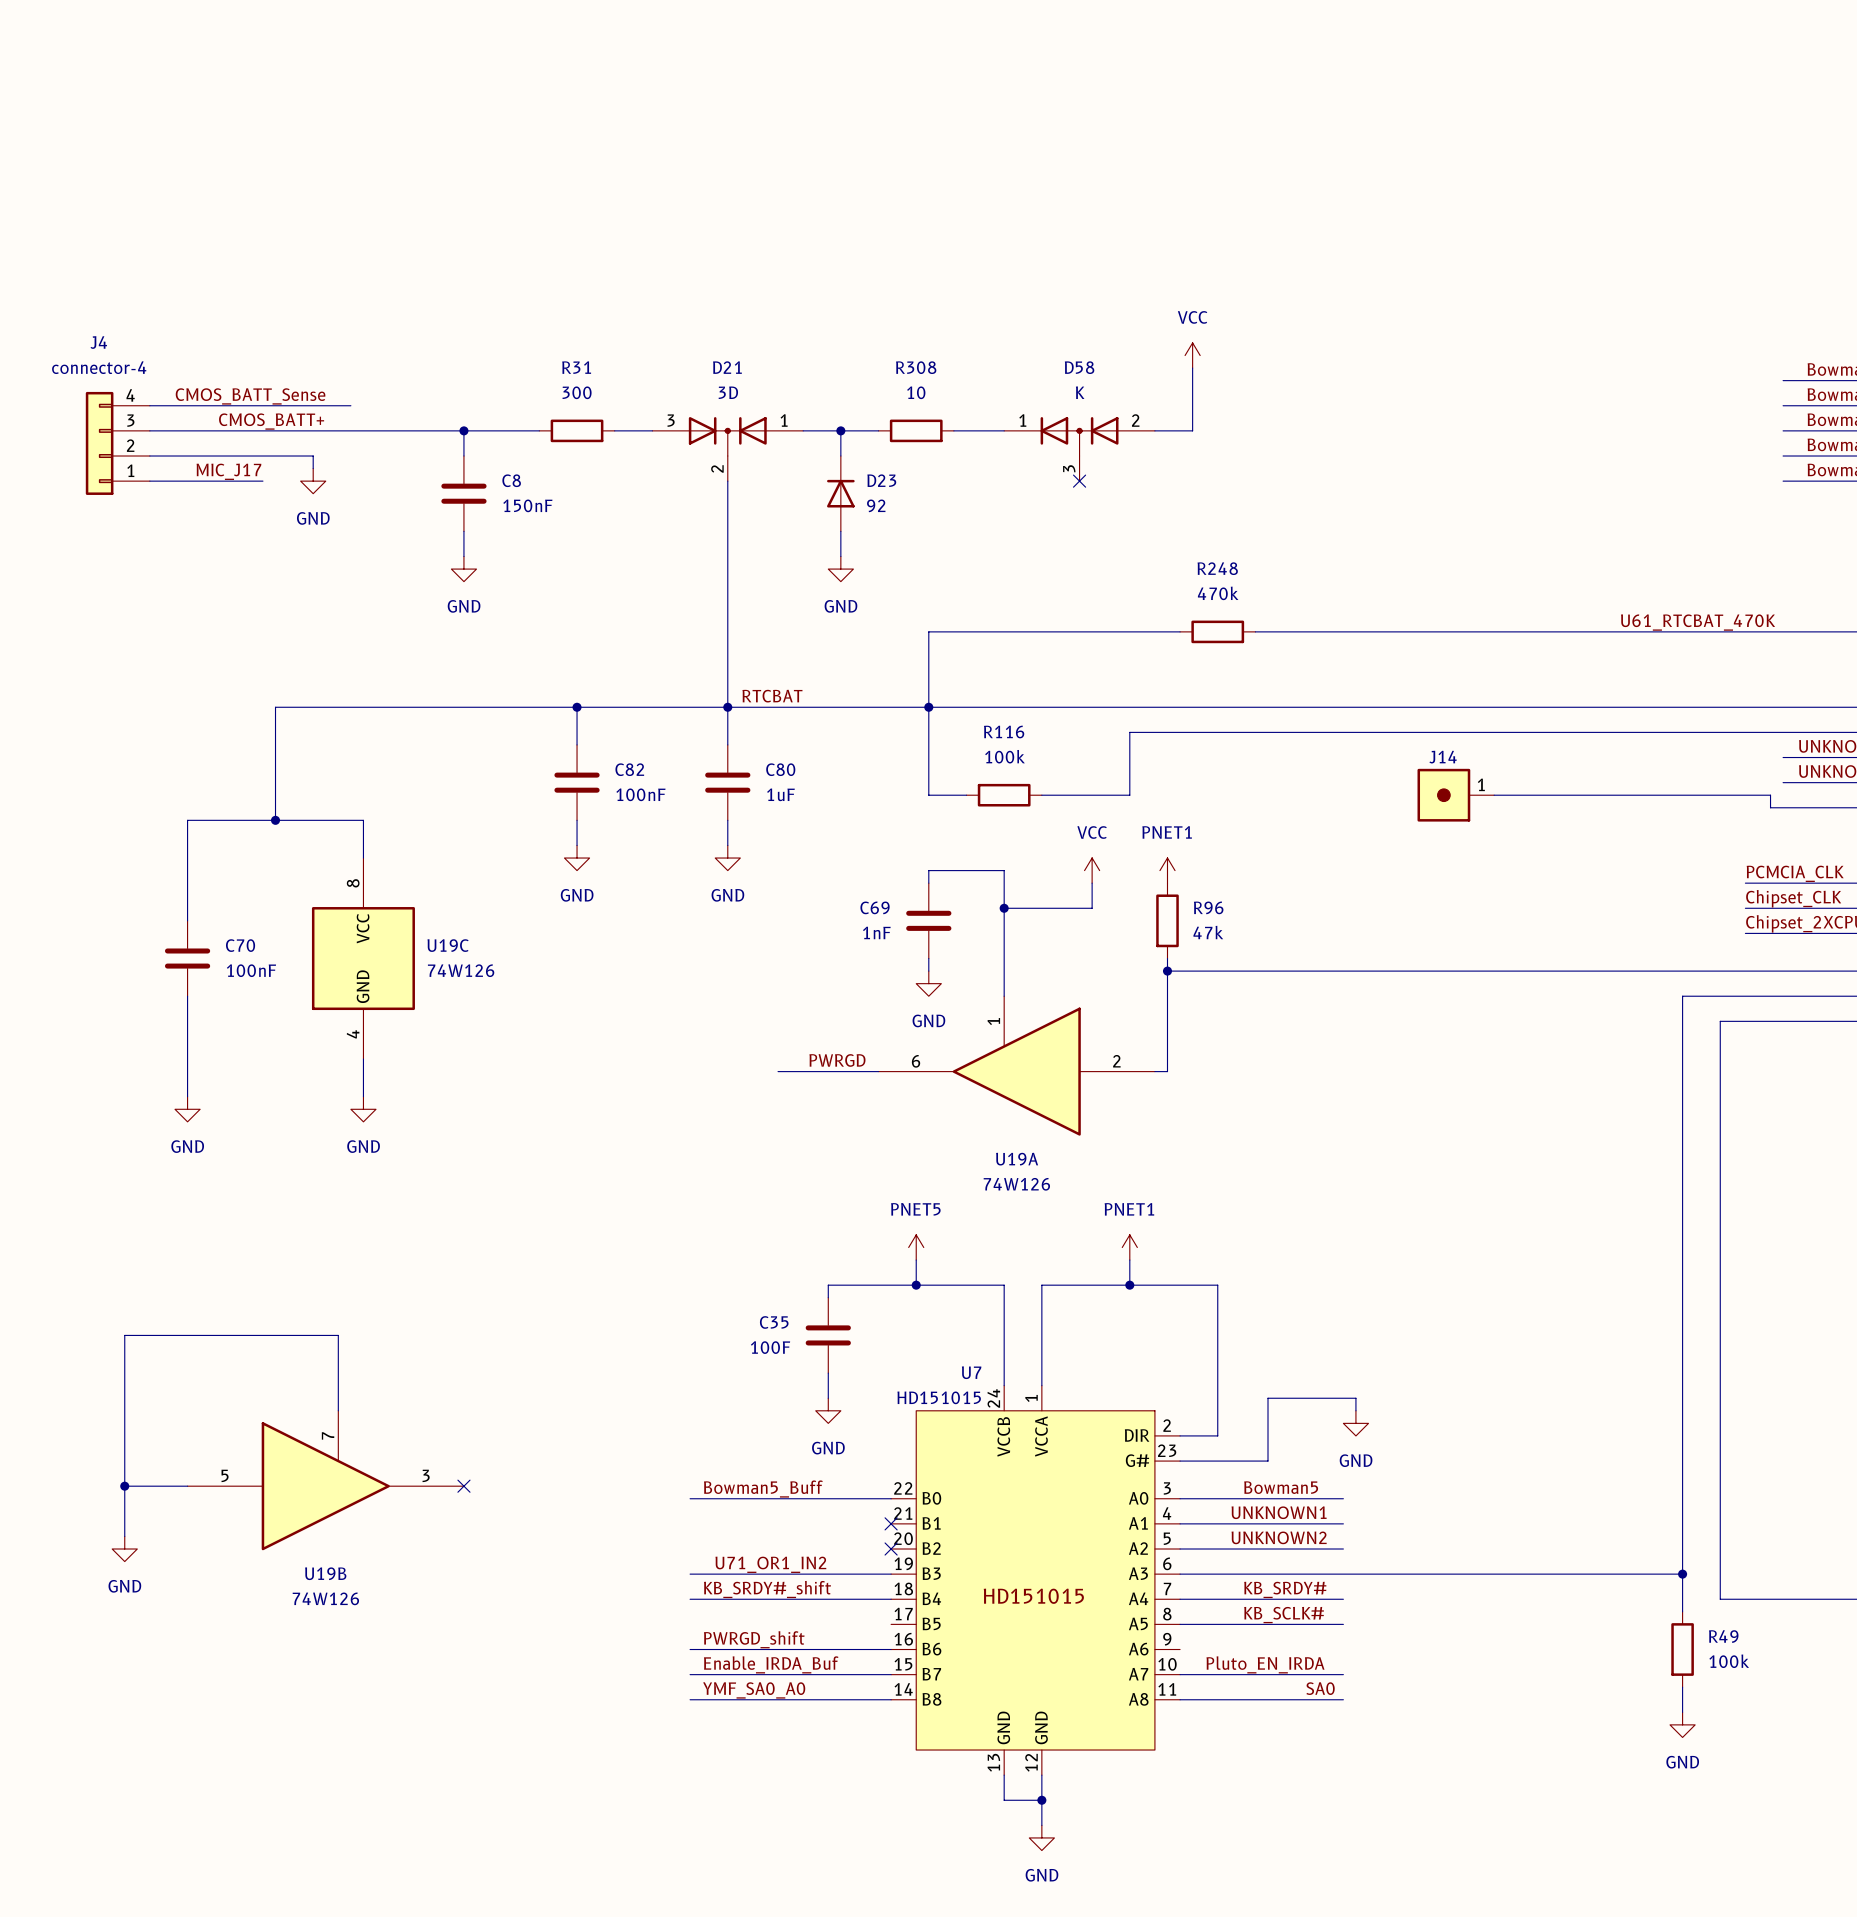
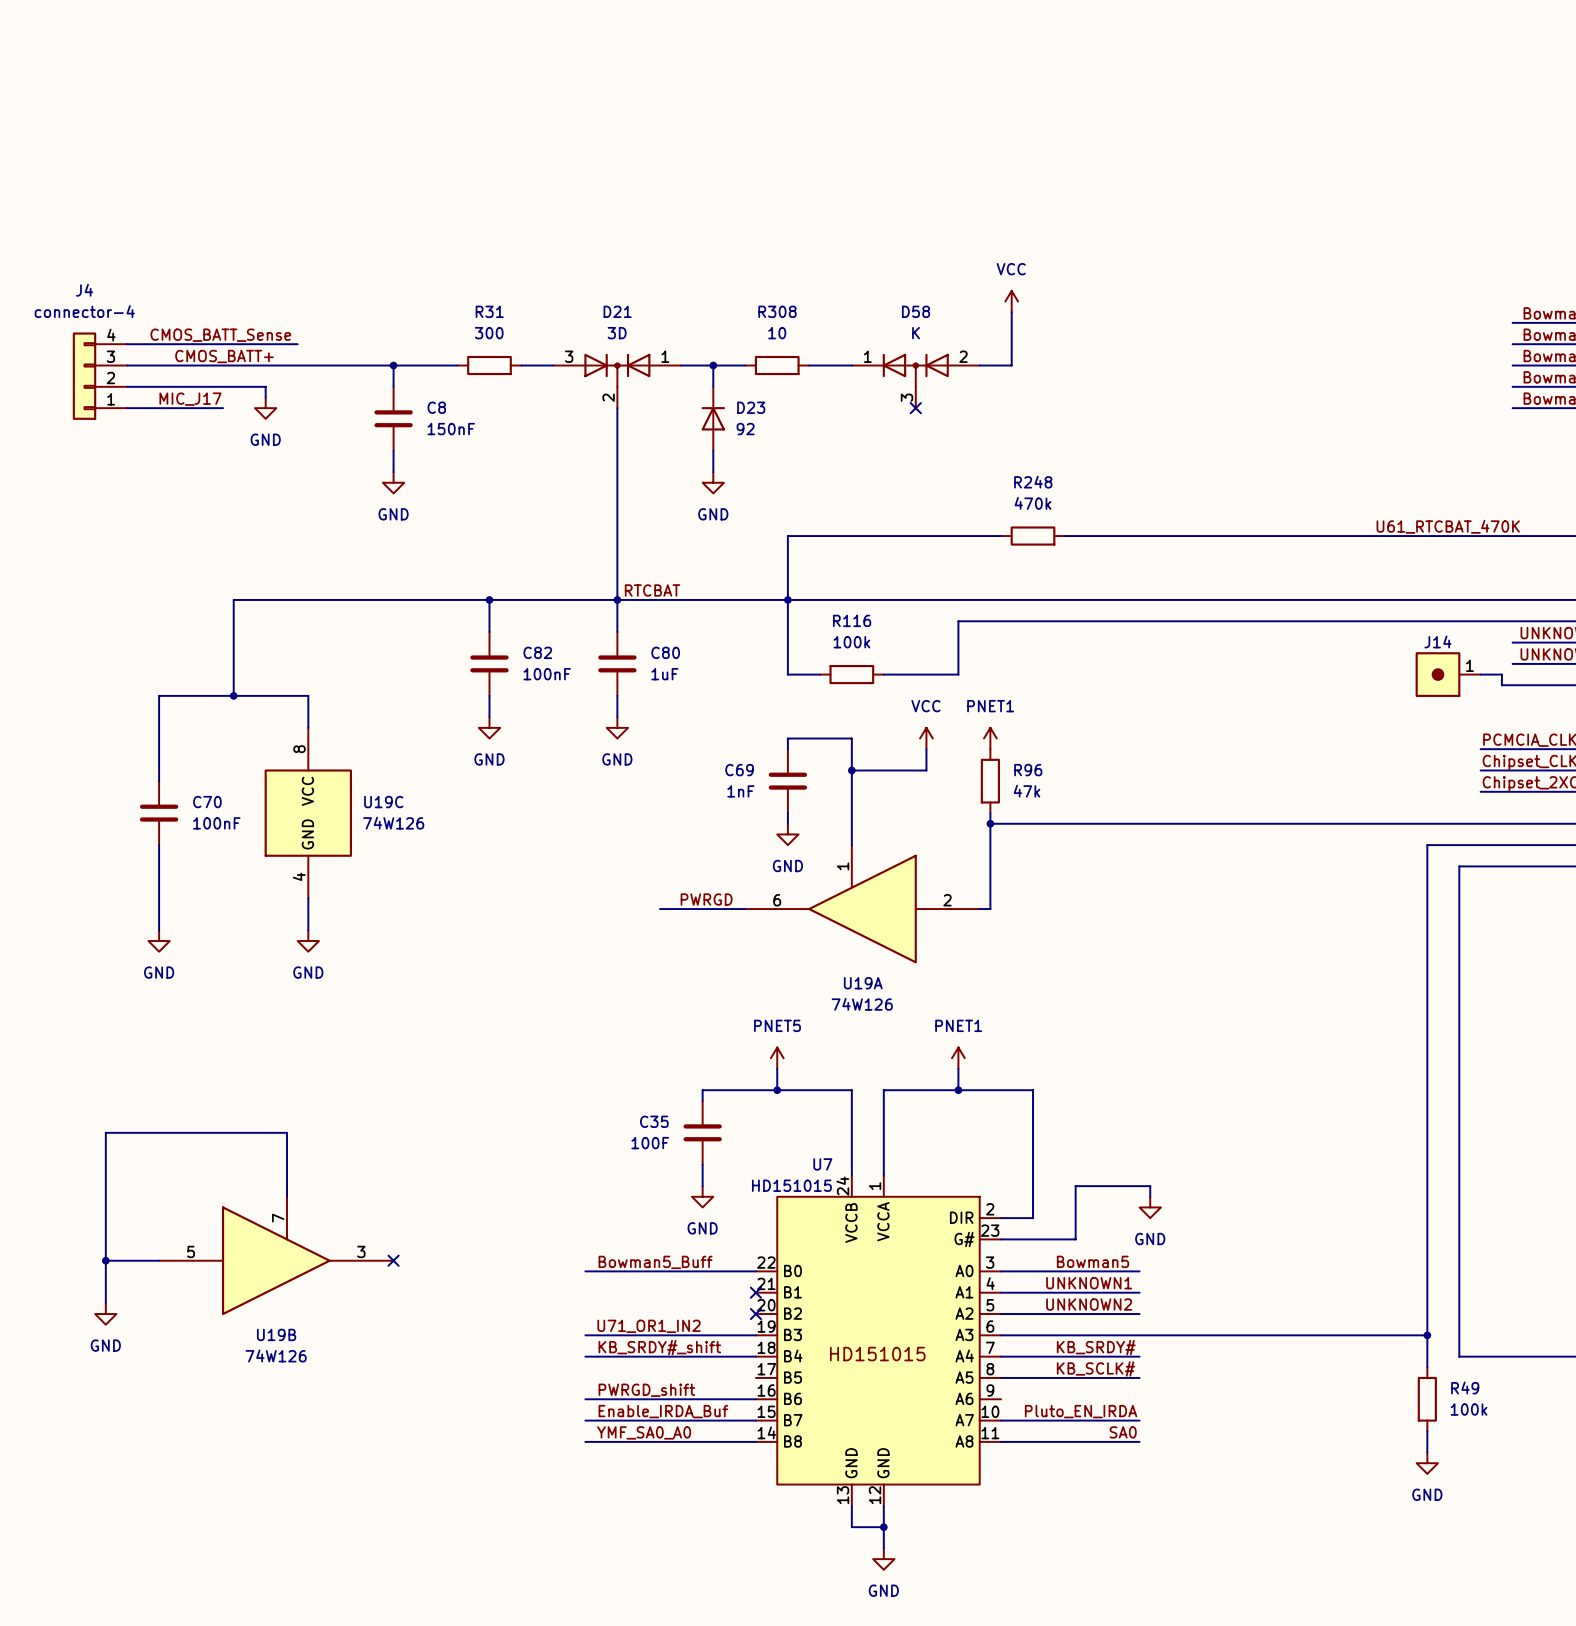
J14 position: (1455, 795) -> (1448, 674)
wire: (1494, 795) (1745, 795) -> none

